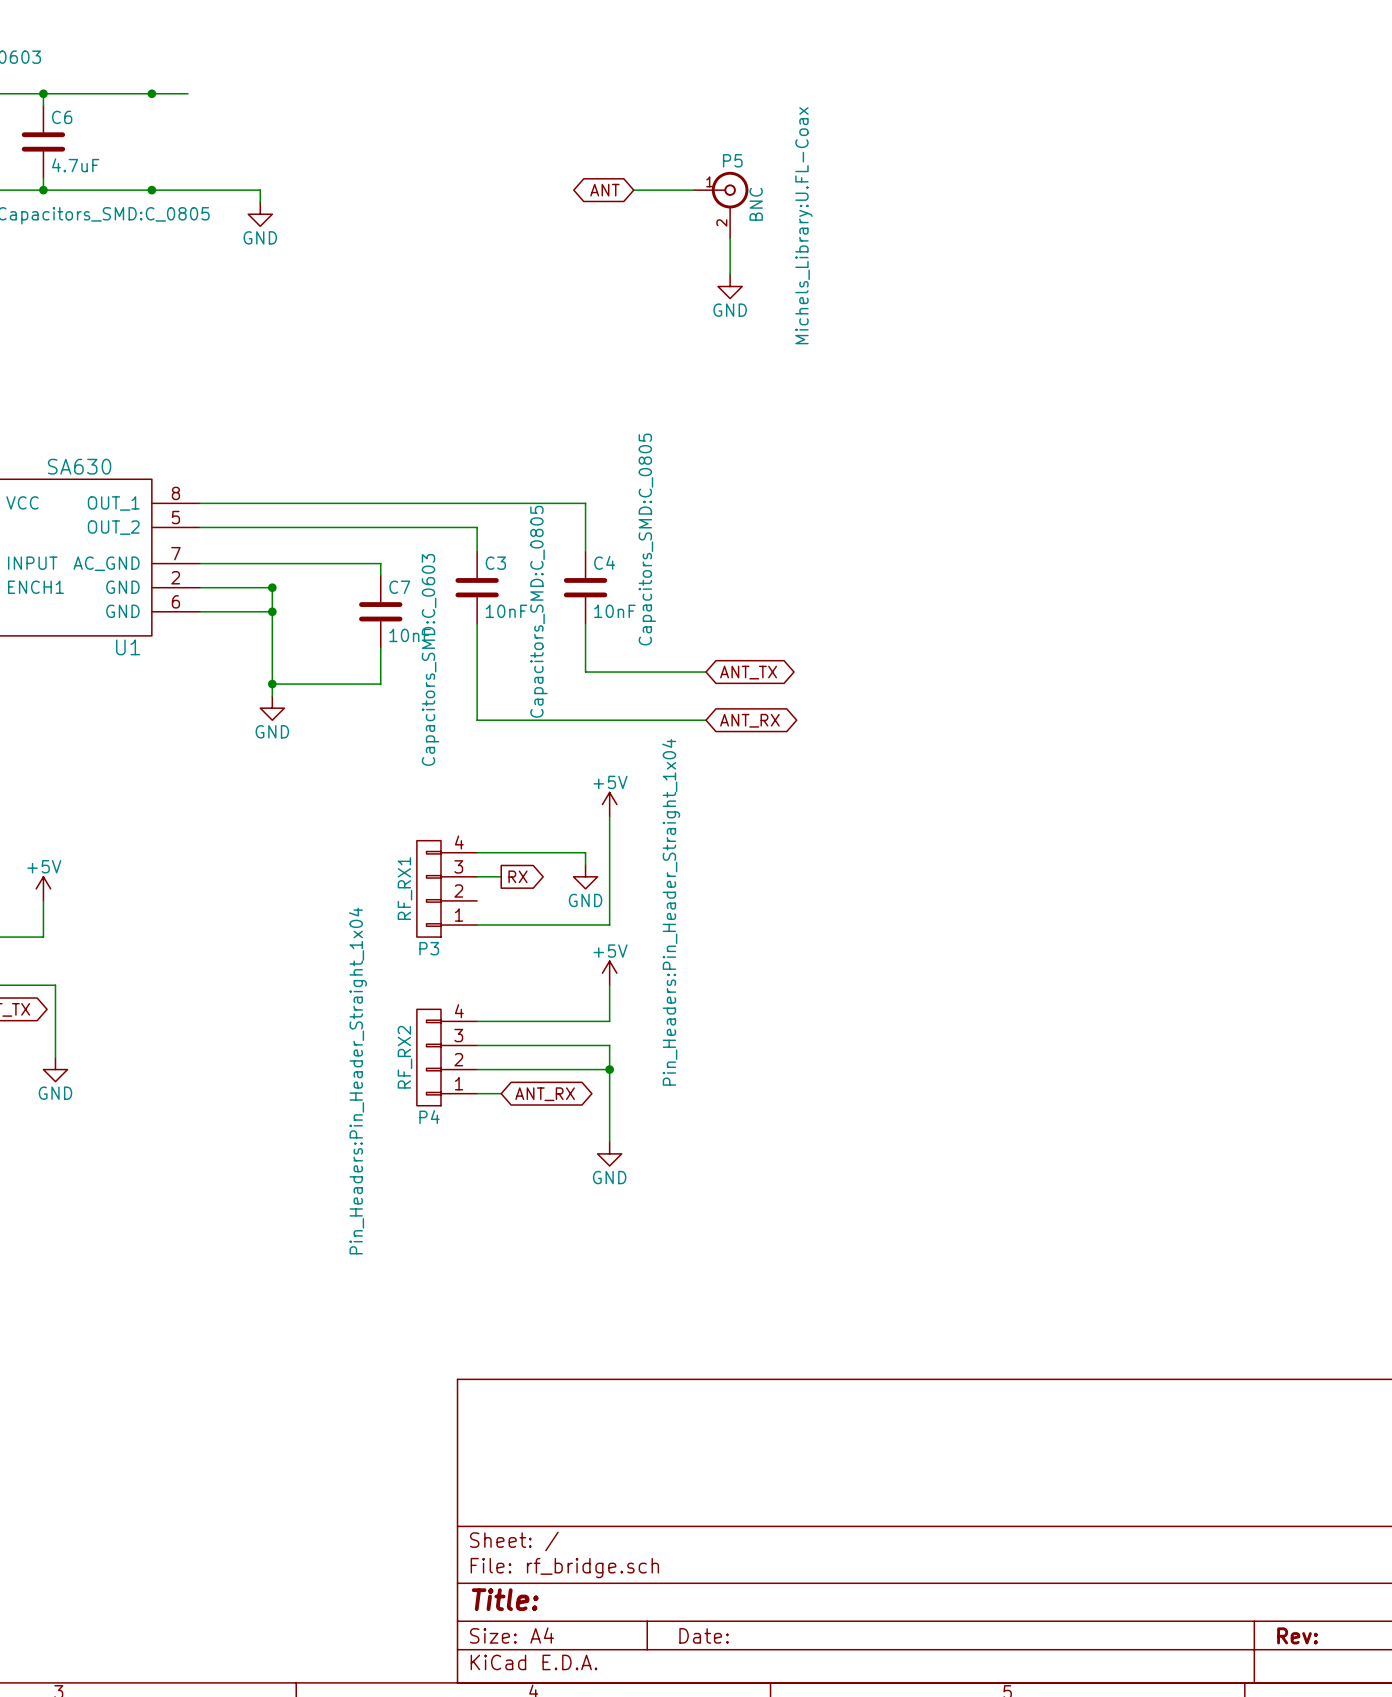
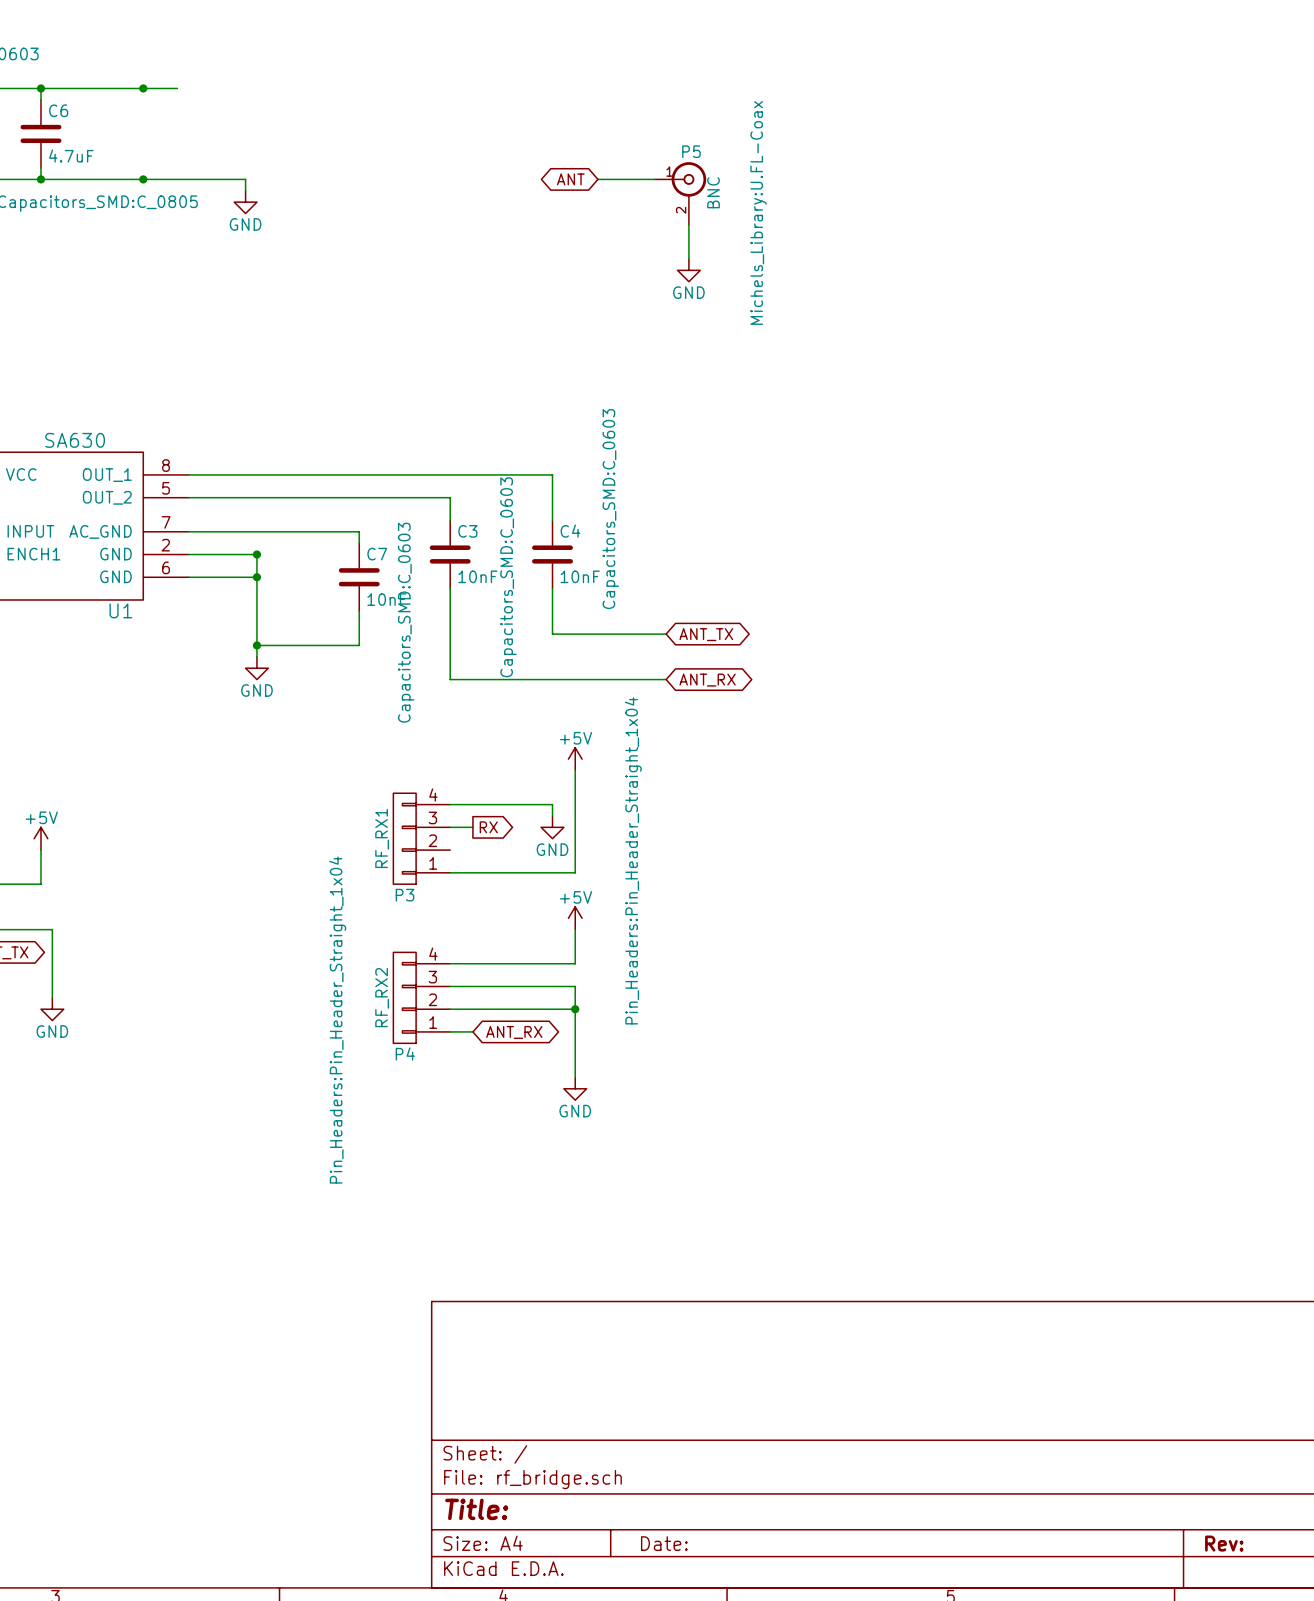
C4 text: Capacitors_SMD:C_0805 (647, 539) -> Capacitors_SMD:C_0603 (610, 509)
C3 text: Capacitors_SMD:C_0805 (538, 611) -> Capacitors_SMD:C_0603 (508, 577)

